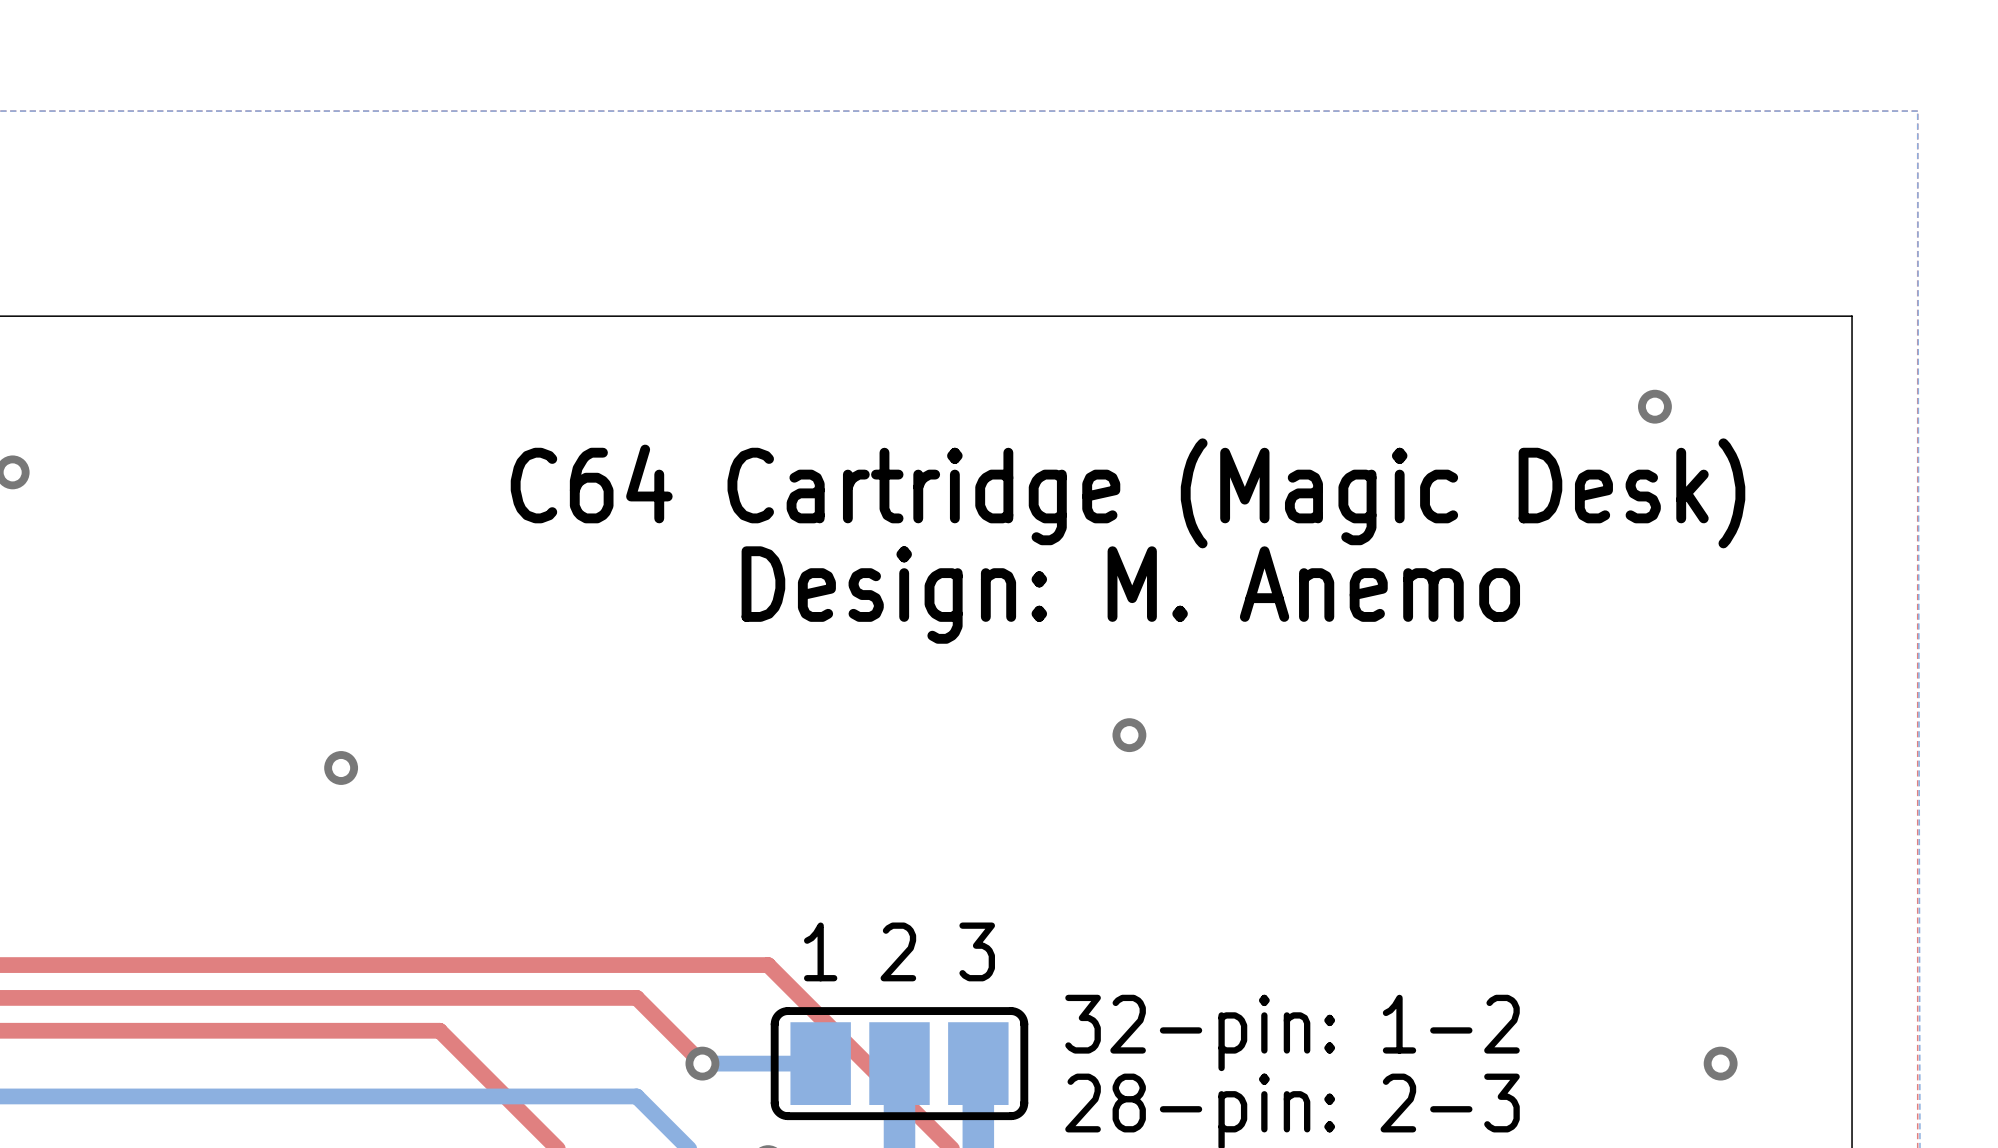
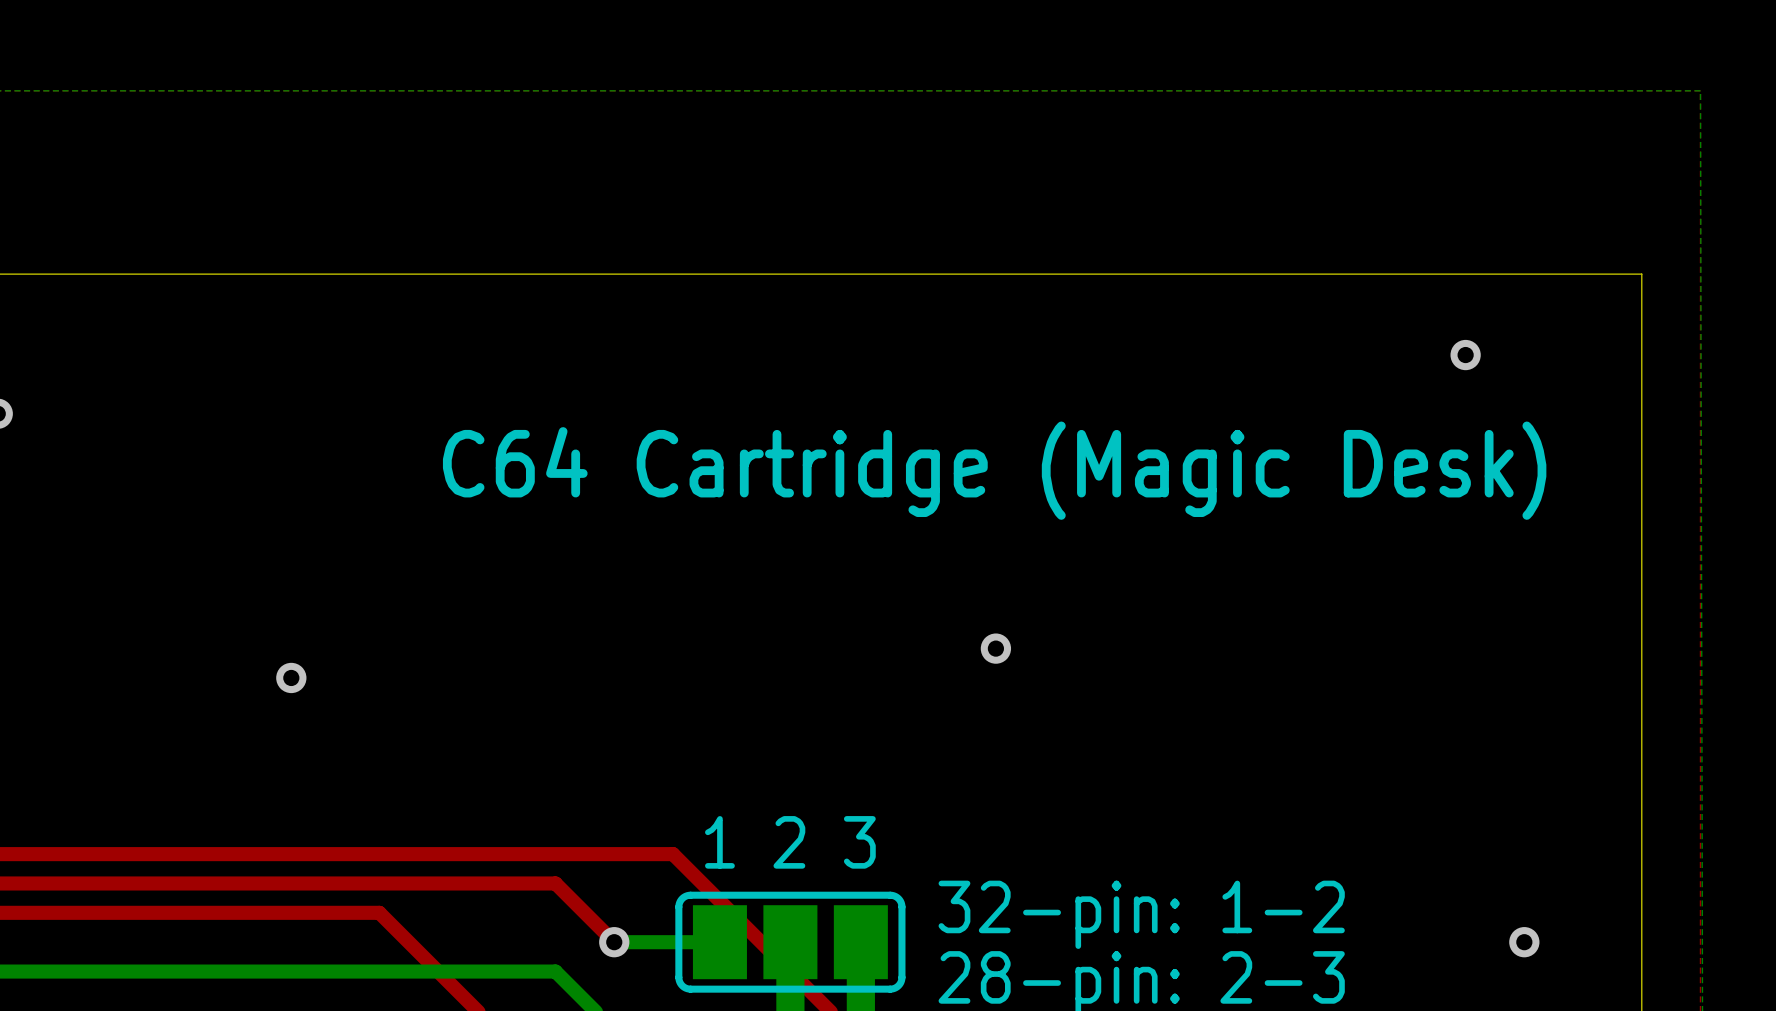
text position: C64 Cartridge (Magic Desk) (1128, 493) -> C64 Cartridge (Magic Desk) (994, 470)
text: Design: M. Anemo (1130, 595) -> none

